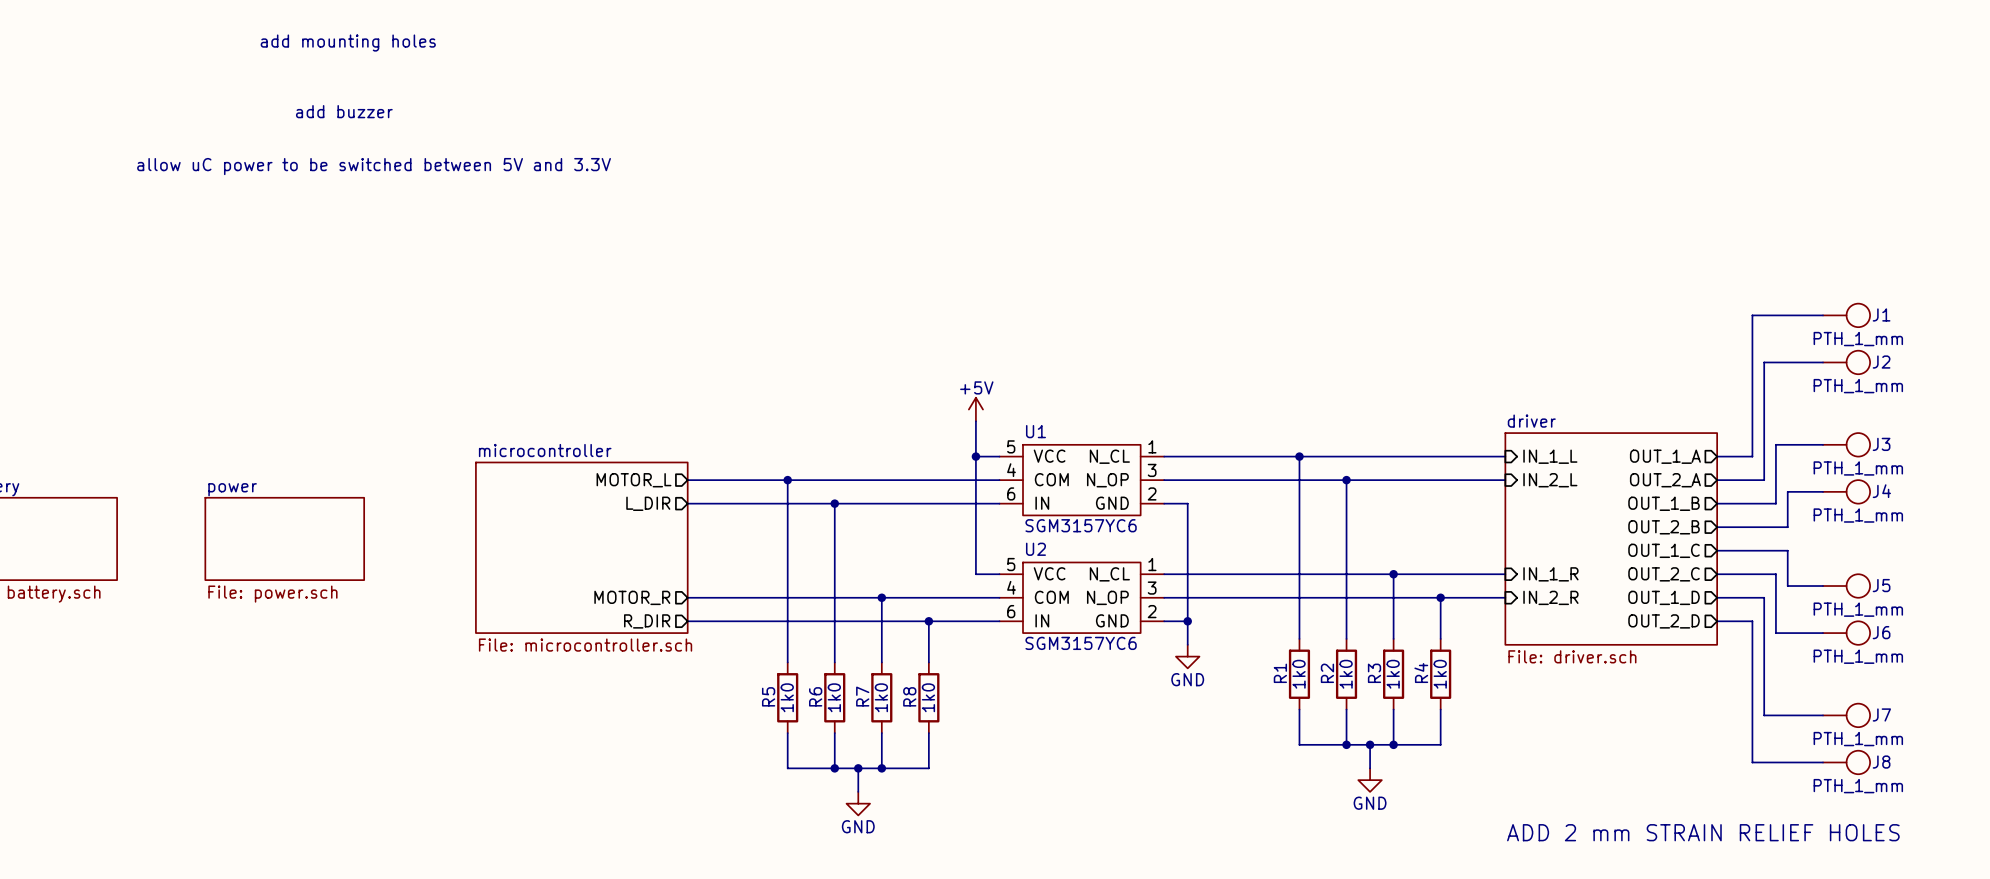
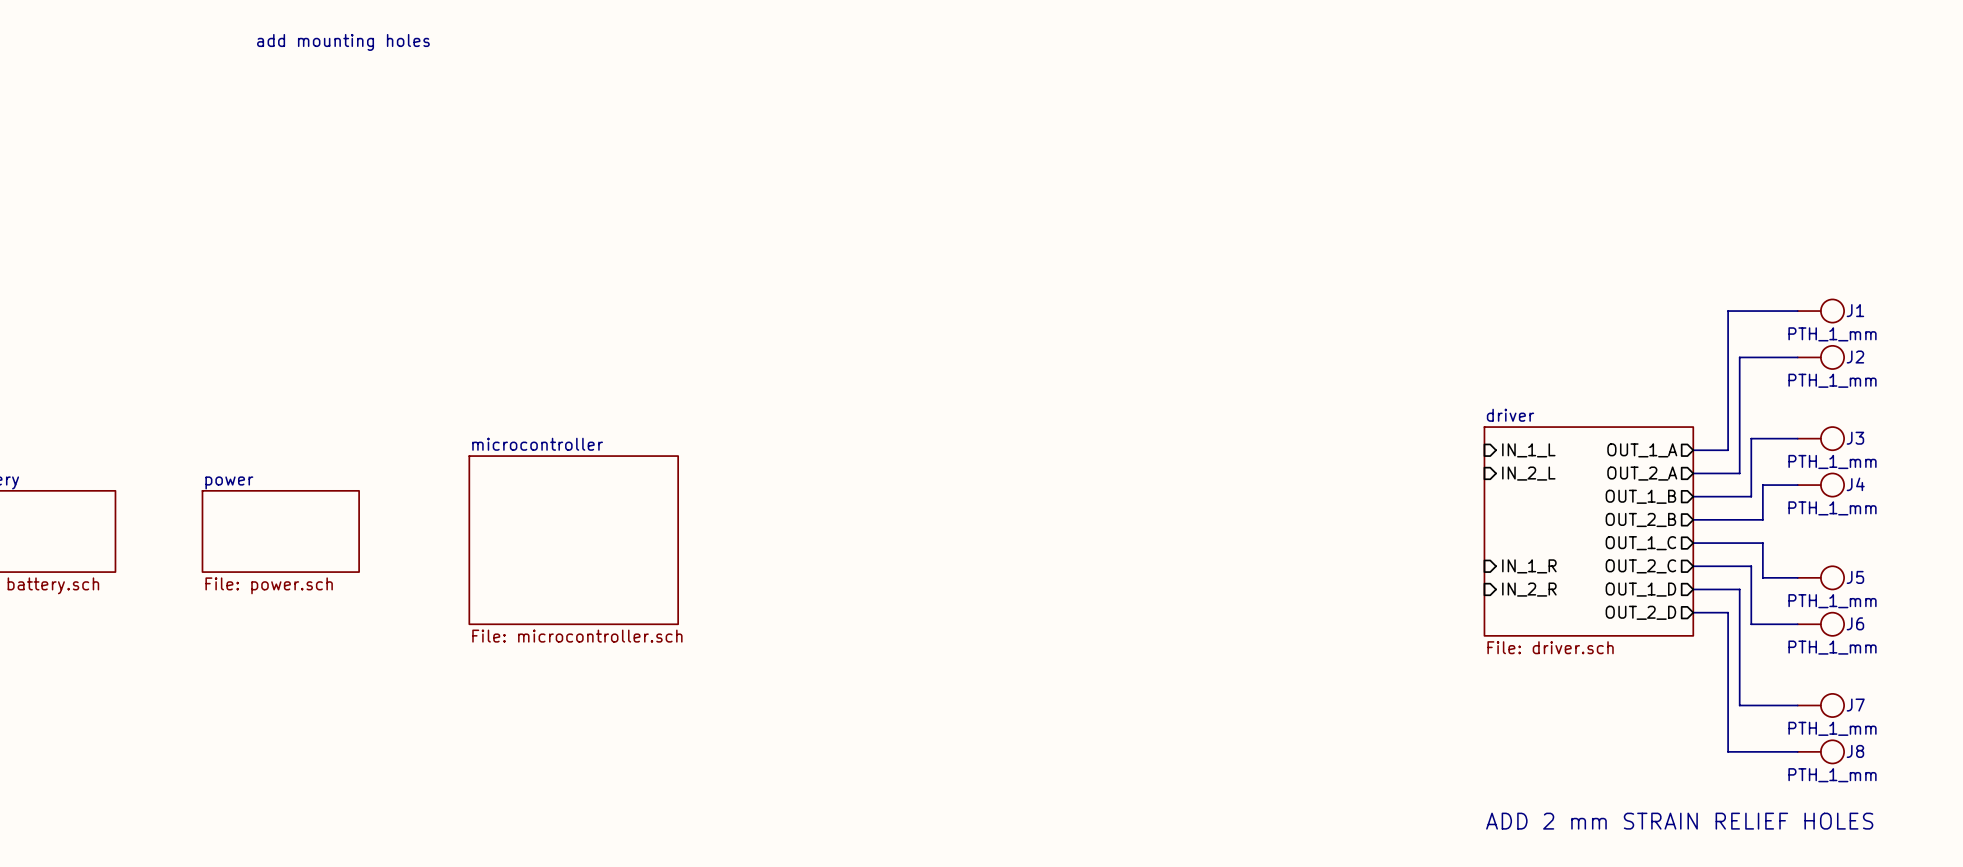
text: add buzzer (344, 111) -> none
text: allow uC power to be switched between 5V and 3.3V (374, 166) -> none
power symbol: +5V (975, 409) -> none
wire: (975, 421) (975, 574) (999, 574) -> none
wire: (975, 456) (999, 456) -> none
junction: (975, 456) -> none
wire: (1164, 456) (1505, 456) -> none
wire: (1299, 456) (1299, 638) -> none
junction: (1299, 456) -> none
sheet pin: MOTOR_L (634, 480) -> none
wire: (687, 480) (999, 480) -> none
wire: (787, 480) (787, 662) -> none
junction: (787, 480) -> none
U1: SGM3157YC6 (1081, 480) -> none
wire: (1164, 480) (1505, 480) -> none
wire: (1346, 480) (1346, 638) -> none
junction: (1346, 480) -> none
sheet pin: L_DIR (648, 503) -> none
wire: (687, 503) (999, 503) -> none
wire: (834, 503) (834, 662) -> none
junction: (834, 503) -> none
wire: (1164, 503) (1187, 503) (1187, 644) -> none
wire: (1164, 574) (1505, 574) -> none
wire: (1393, 574) (1393, 638) -> none
junction: (1393, 574) -> none
sheet pin: MOTOR_R (632, 597) -> none
wire: (687, 597) (999, 597) -> none
wire: (881, 597) (881, 662) -> none
junction: (881, 597) -> none
U2: SGM3157YC6 (1081, 597) -> none
wire: (1164, 597) (1505, 597) -> none
wire: (1440, 597) (1440, 638) -> none
junction: (1440, 597) -> none
sheet pin: R_DIR (647, 621) -> none
wire: (687, 621) (999, 621) -> none
wire: (928, 621) (928, 662) -> none
junction: (928, 621) -> none
wire: (1164, 621) (1187, 621) -> none
junction: (1187, 621) -> none
power symbol: GND (1187, 656) -> none
R1: (1299, 674) -> none
R2: (1346, 674) -> none
R3: (1393, 674) -> none
R4: (1440, 674) -> none
R5: (787, 697) -> none
R6: (834, 697) -> none
R7: (881, 697) -> none
R8: (928, 697) -> none
wire: (1299, 709) (1299, 744) (1440, 744) (1440, 709) -> none
wire: (1346, 709) (1346, 744) -> none
wire: (1393, 709) (1393, 744) -> none
wire: (787, 733) (787, 768) (928, 768) (928, 733) -> none
wire: (834, 733) (834, 768) -> none
wire: (881, 733) (881, 768) -> none
junction: (1346, 744) -> none
wire: (1370, 744) (1370, 768) -> none
junction: (1370, 744) -> none
junction: (1393, 744) -> none
junction: (834, 768) -> none
wire: (858, 768) (858, 791) -> none
junction: (858, 768) -> none
junction: (881, 768) -> none
power symbol: GND (1370, 780) -> none
power symbol: GND (858, 803) -> none

